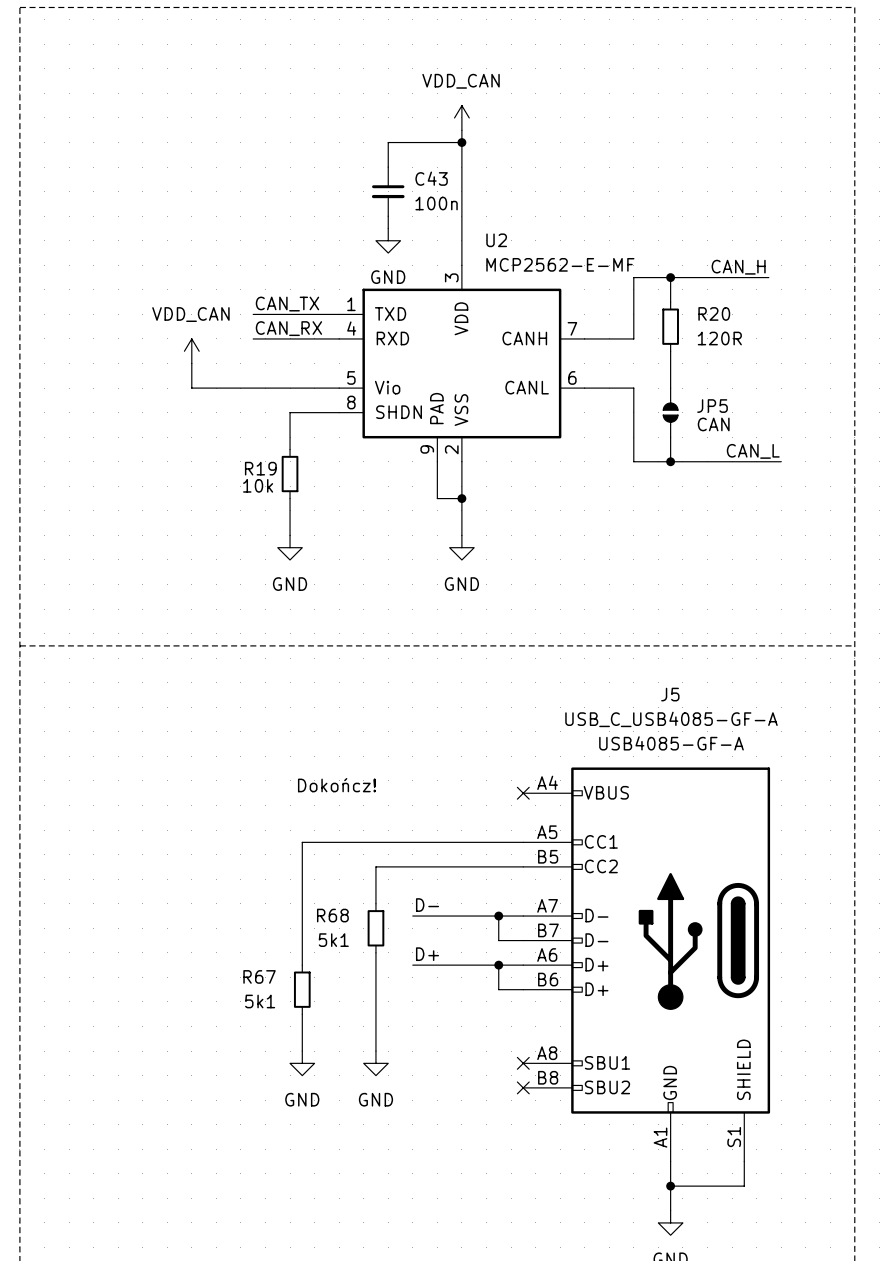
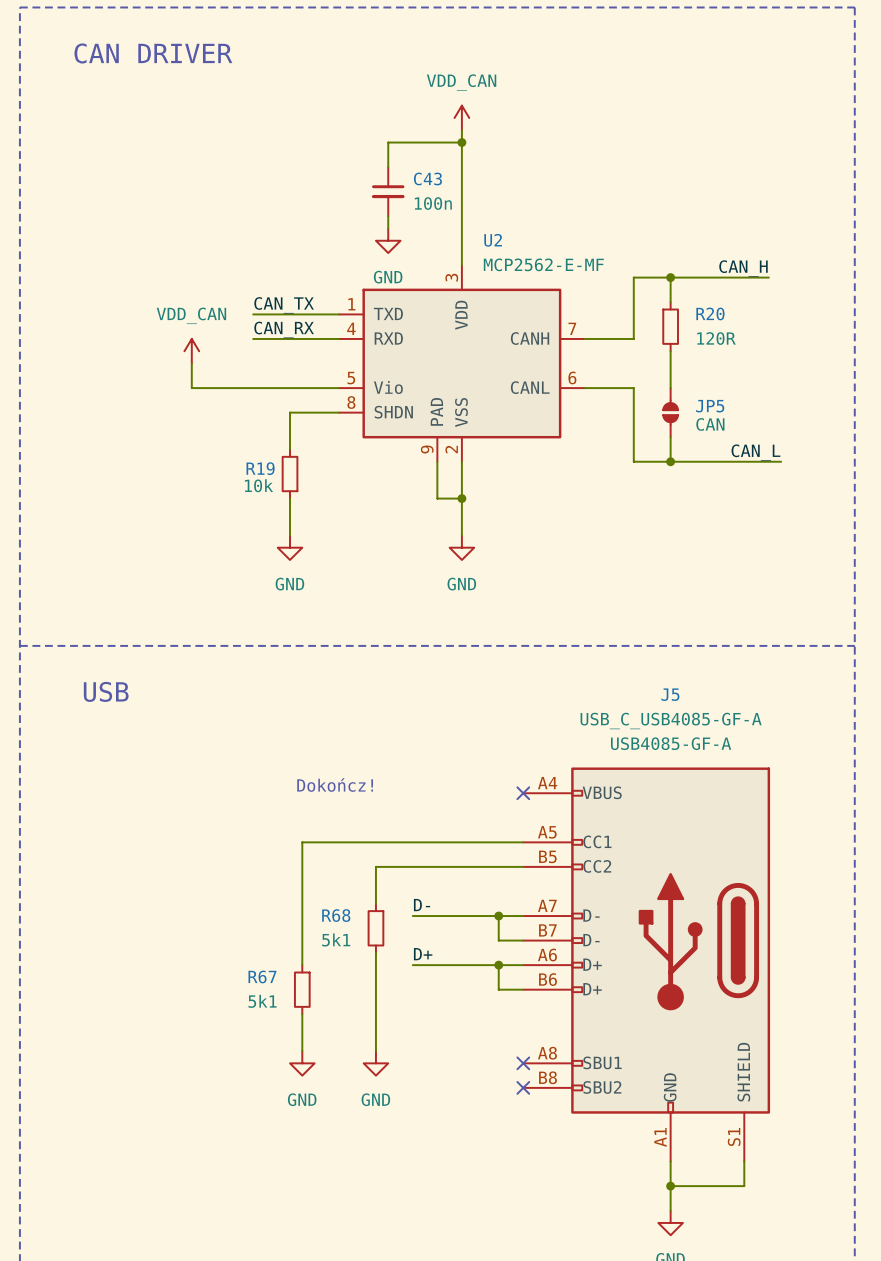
text: none -> CAN DRIVER (153, 53)
text: none -> USB (106, 691)

